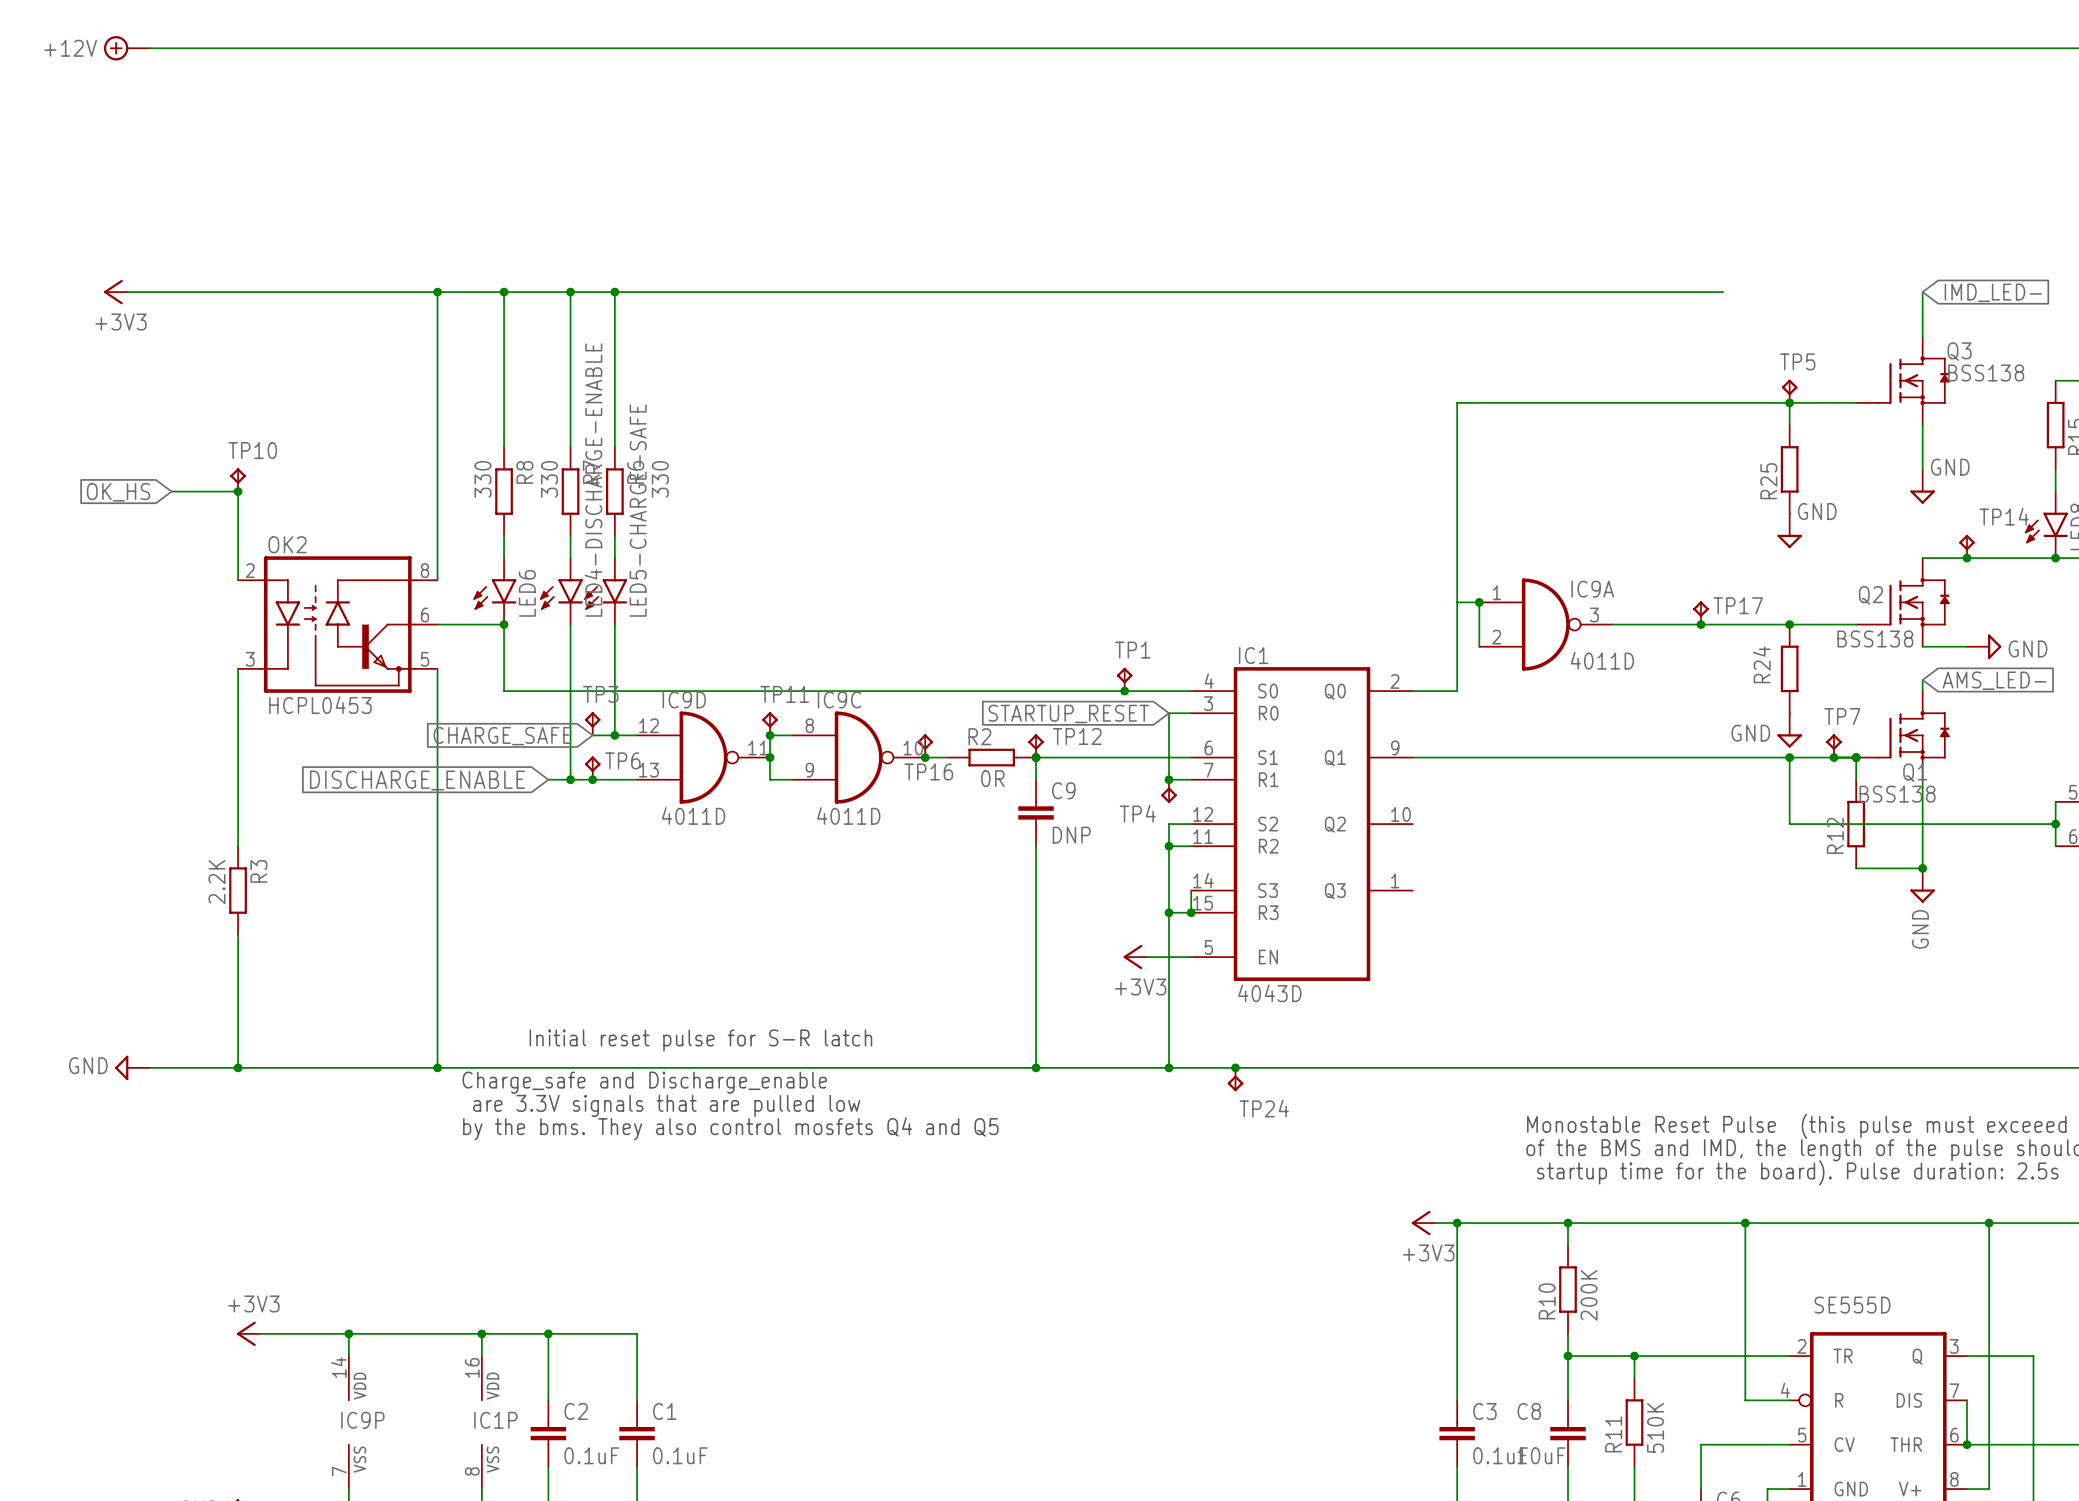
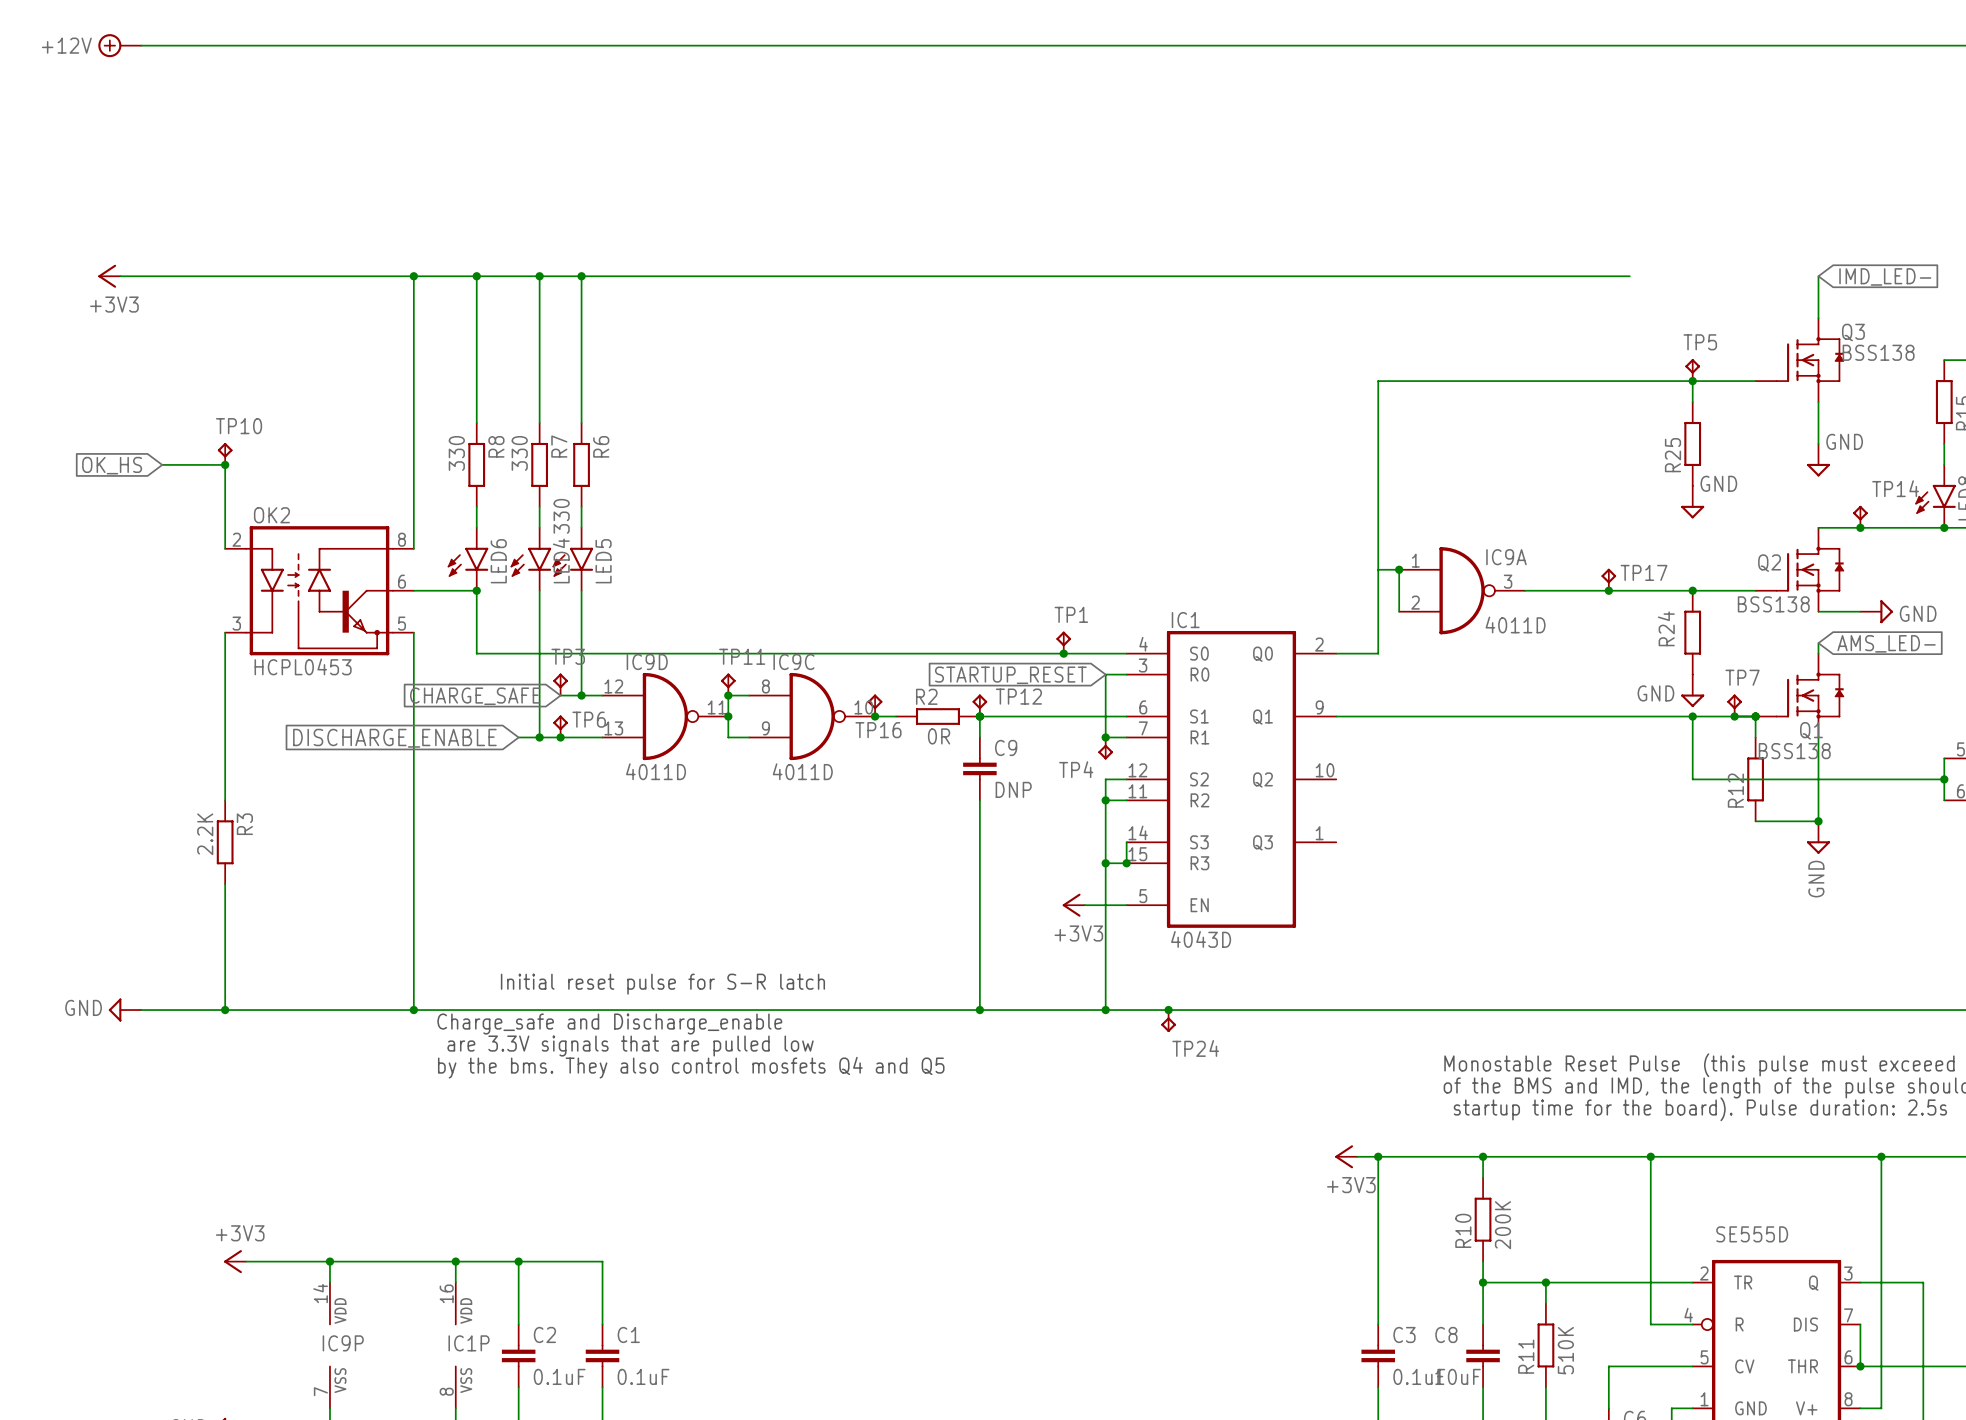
R6 value position: 330 (660, 479) -> 330 (561, 516)
LED4-DISCHARGE-ENABLE name: LED4-DISCHARGE-ENABLE (593, 480) -> LED4 (561, 560)
LED5-CHARGE-SAFE name: LED5-CHARGE-SAFE (638, 510) -> LED5 (603, 561)

